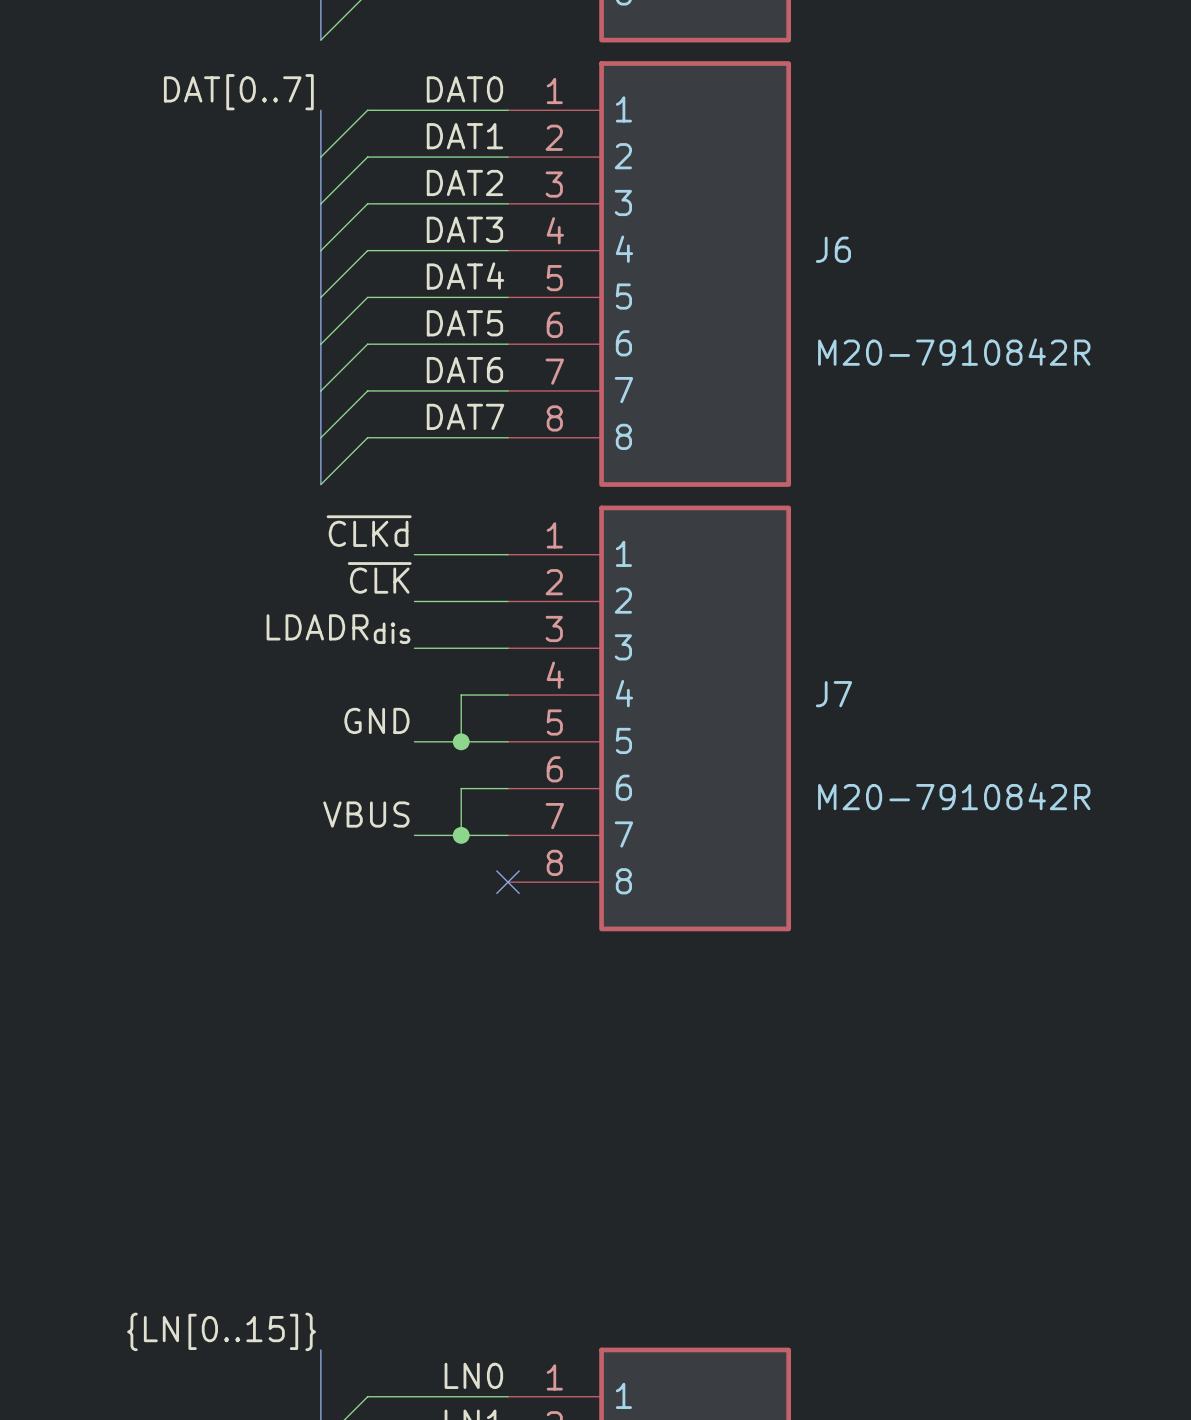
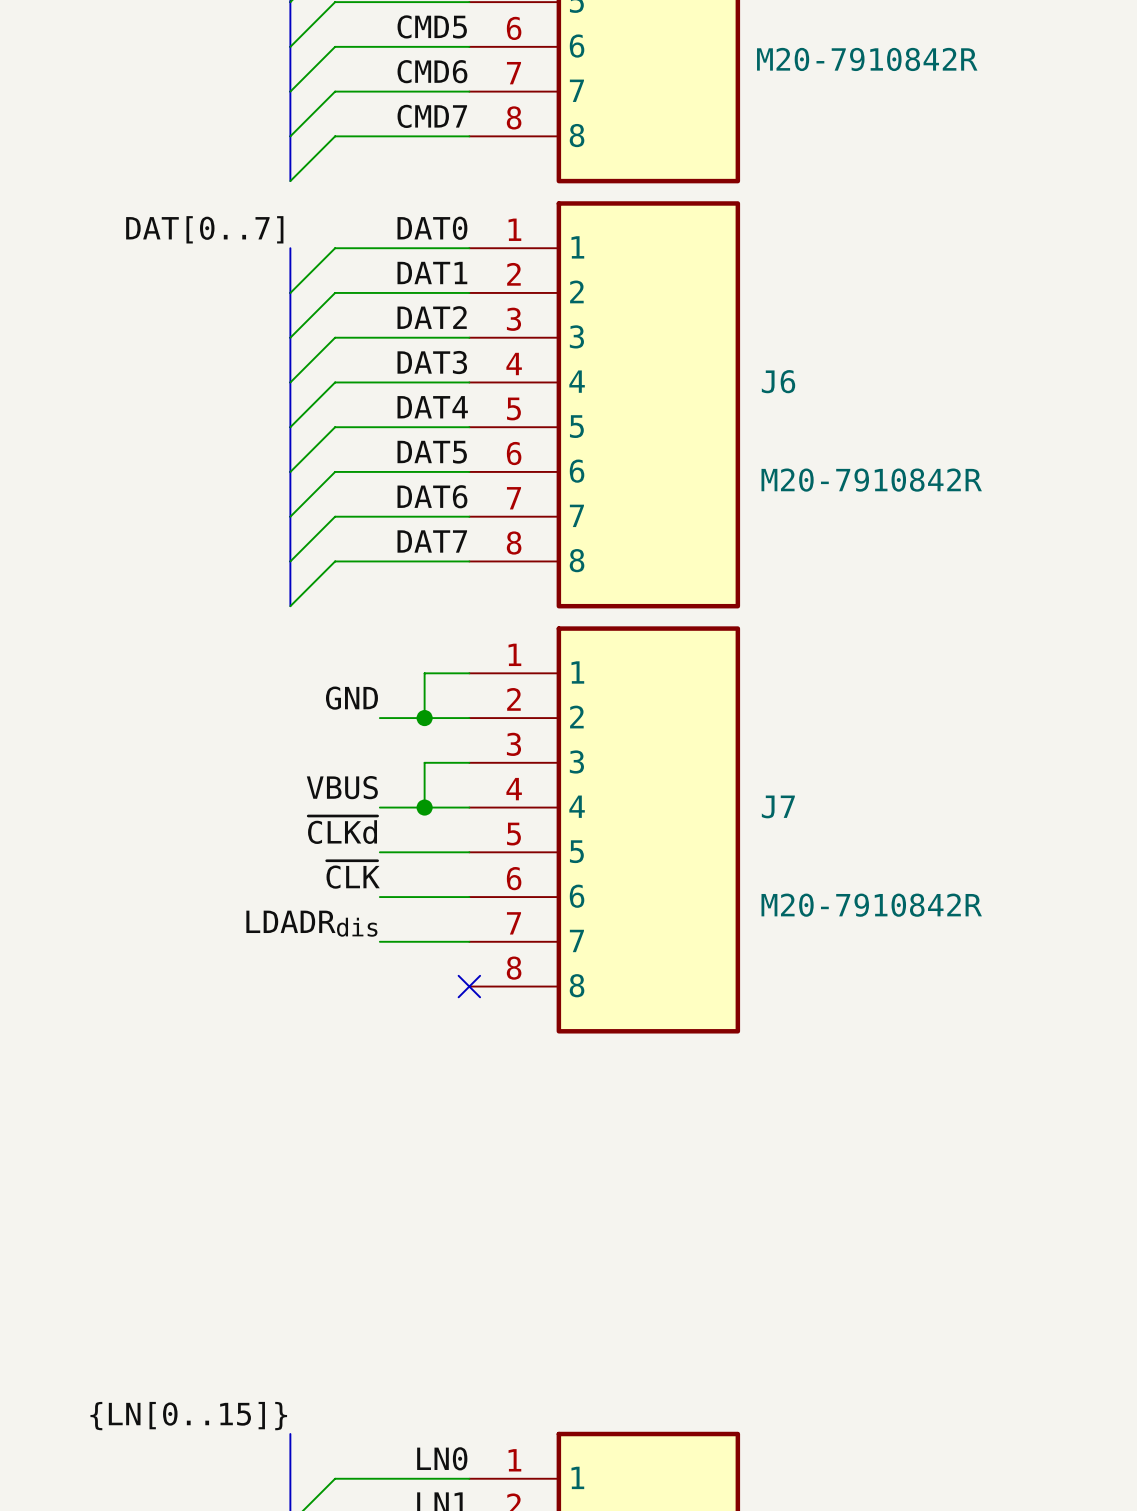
label: ~{CLKd} (369, 531) -> none
wire: (414, 554) (461, 554) -> (424, 718) (424, 673)
label: ~{CLK} (379, 577) -> GND (351, 698)
junction: none -> (424, 718)
label: LDADRdis (338, 629) -> none
wire: (414, 648) (461, 648) -> (379, 807) (424, 807) (424, 762)
label: none -> VBUS (342, 787)
wire: (461, 695) (461, 741) -> none
label: GND (376, 720) -> ~{CLKd} (342, 829)
junction position: (461, 741) -> (424, 807)
label: none -> ~{CLK} (353, 874)
wire: (461, 788) (461, 835) -> (424, 897) (379, 897)
label: VBUS (366, 814) -> LDADRdis (311, 923)
junction: (461, 835) -> none

